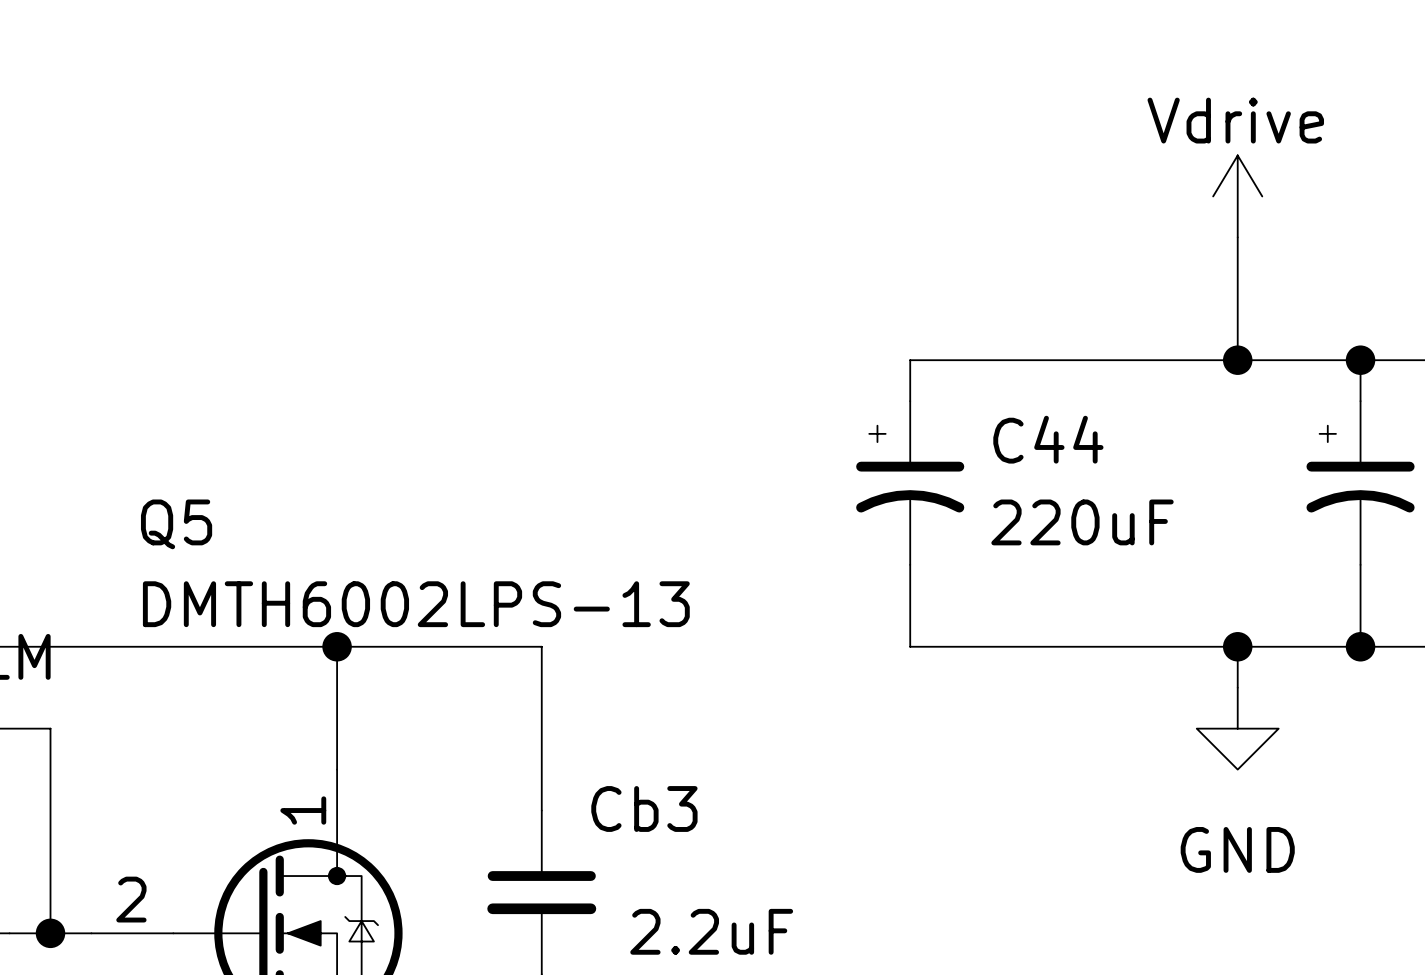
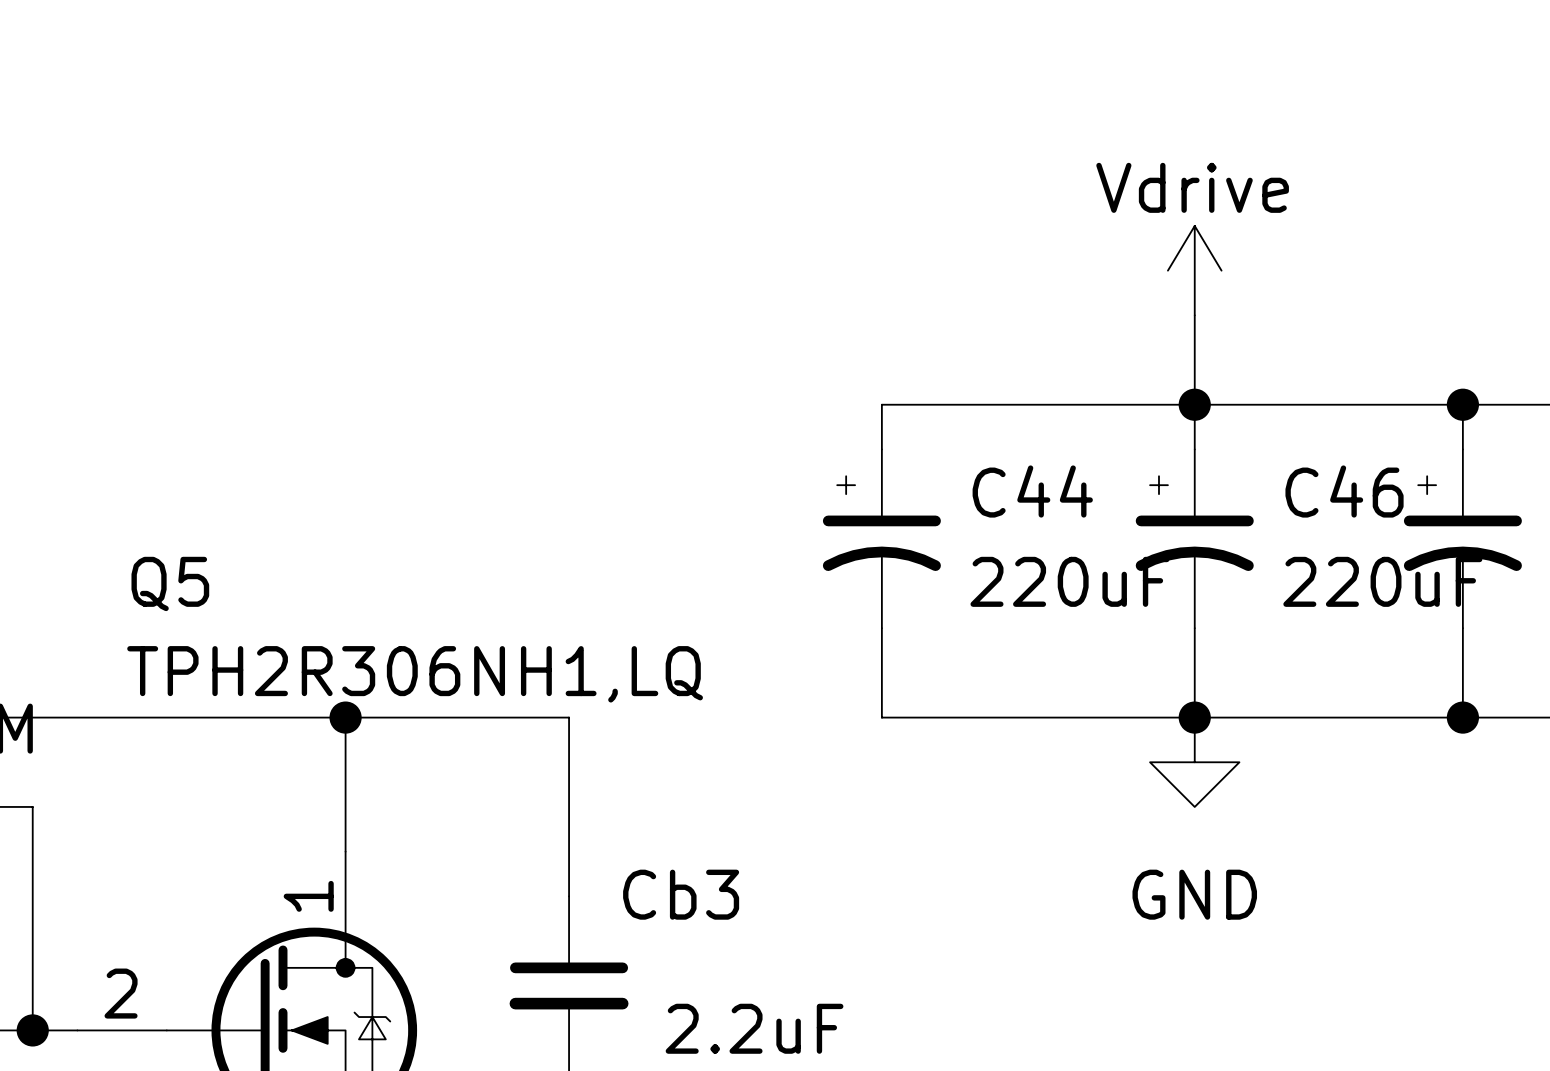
power symbol position: Vdrive (1237, 196) -> Vdrive (1194, 270)
wire: (1237, 237) (1237, 360) -> (1194, 315) (1194, 449)
wire: (910, 360) (910, 401) -> (971, 404) (881, 404) (881, 449)
junction position: (1237, 360) -> (1194, 404)
C44 position: (910, 483) -> (881, 538)
C46: none -> 220uF (1194, 538)
wire: (910, 564) (910, 646) -> (881, 628) (881, 717) (971, 717)
wire: none -> (1194, 628) (1194, 717)
Q5 value: DMTH6002LPS-13 (416, 604) -> TPH2R306NH1,LQ (415, 674)
wire: (1237, 646) (1237, 687) -> none
junction position: (1237, 646) -> (1194, 717)
power symbol position: GND (1237, 728) -> GND (1194, 762)

